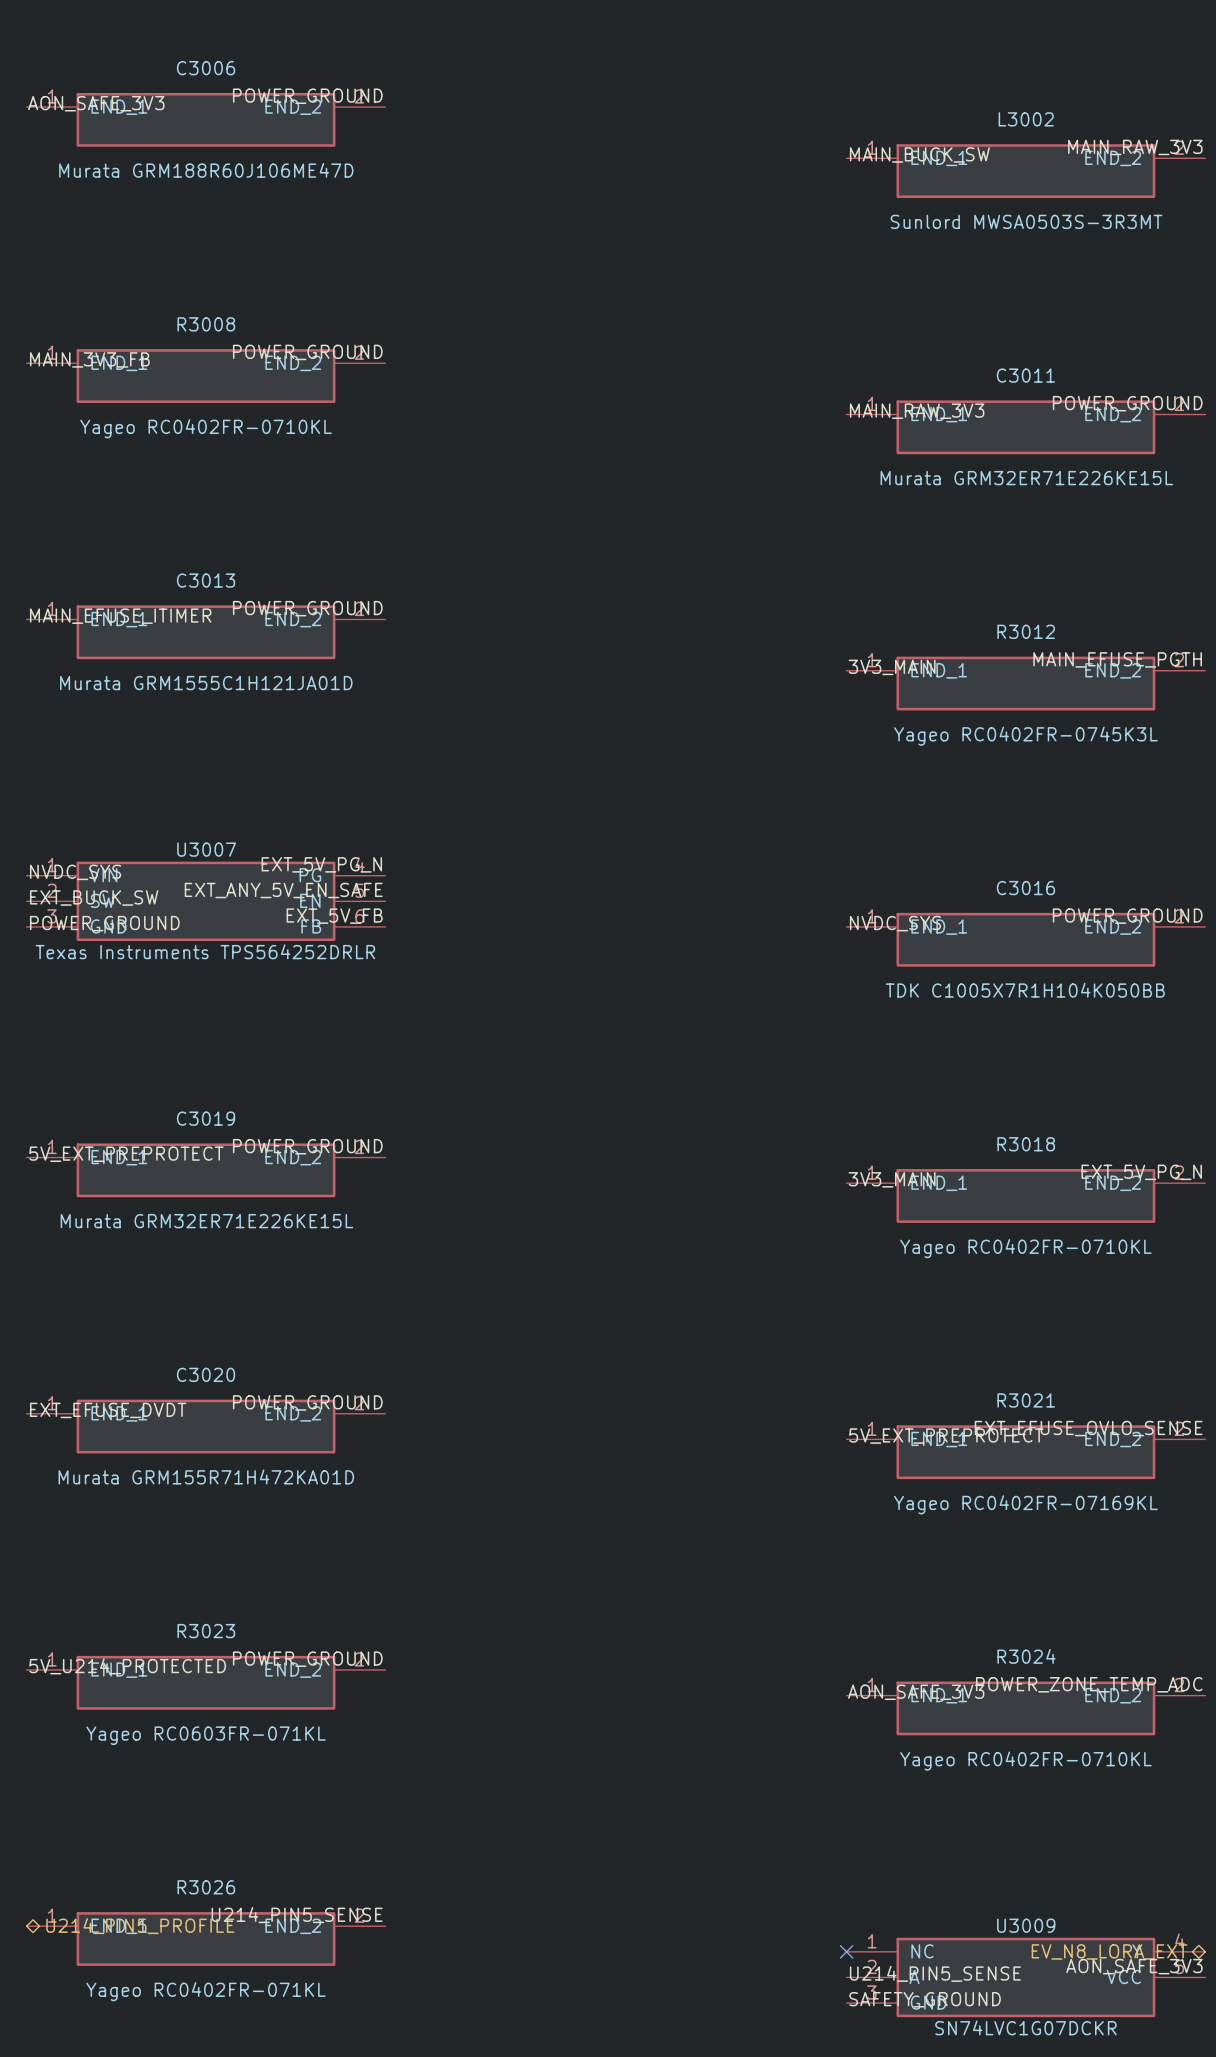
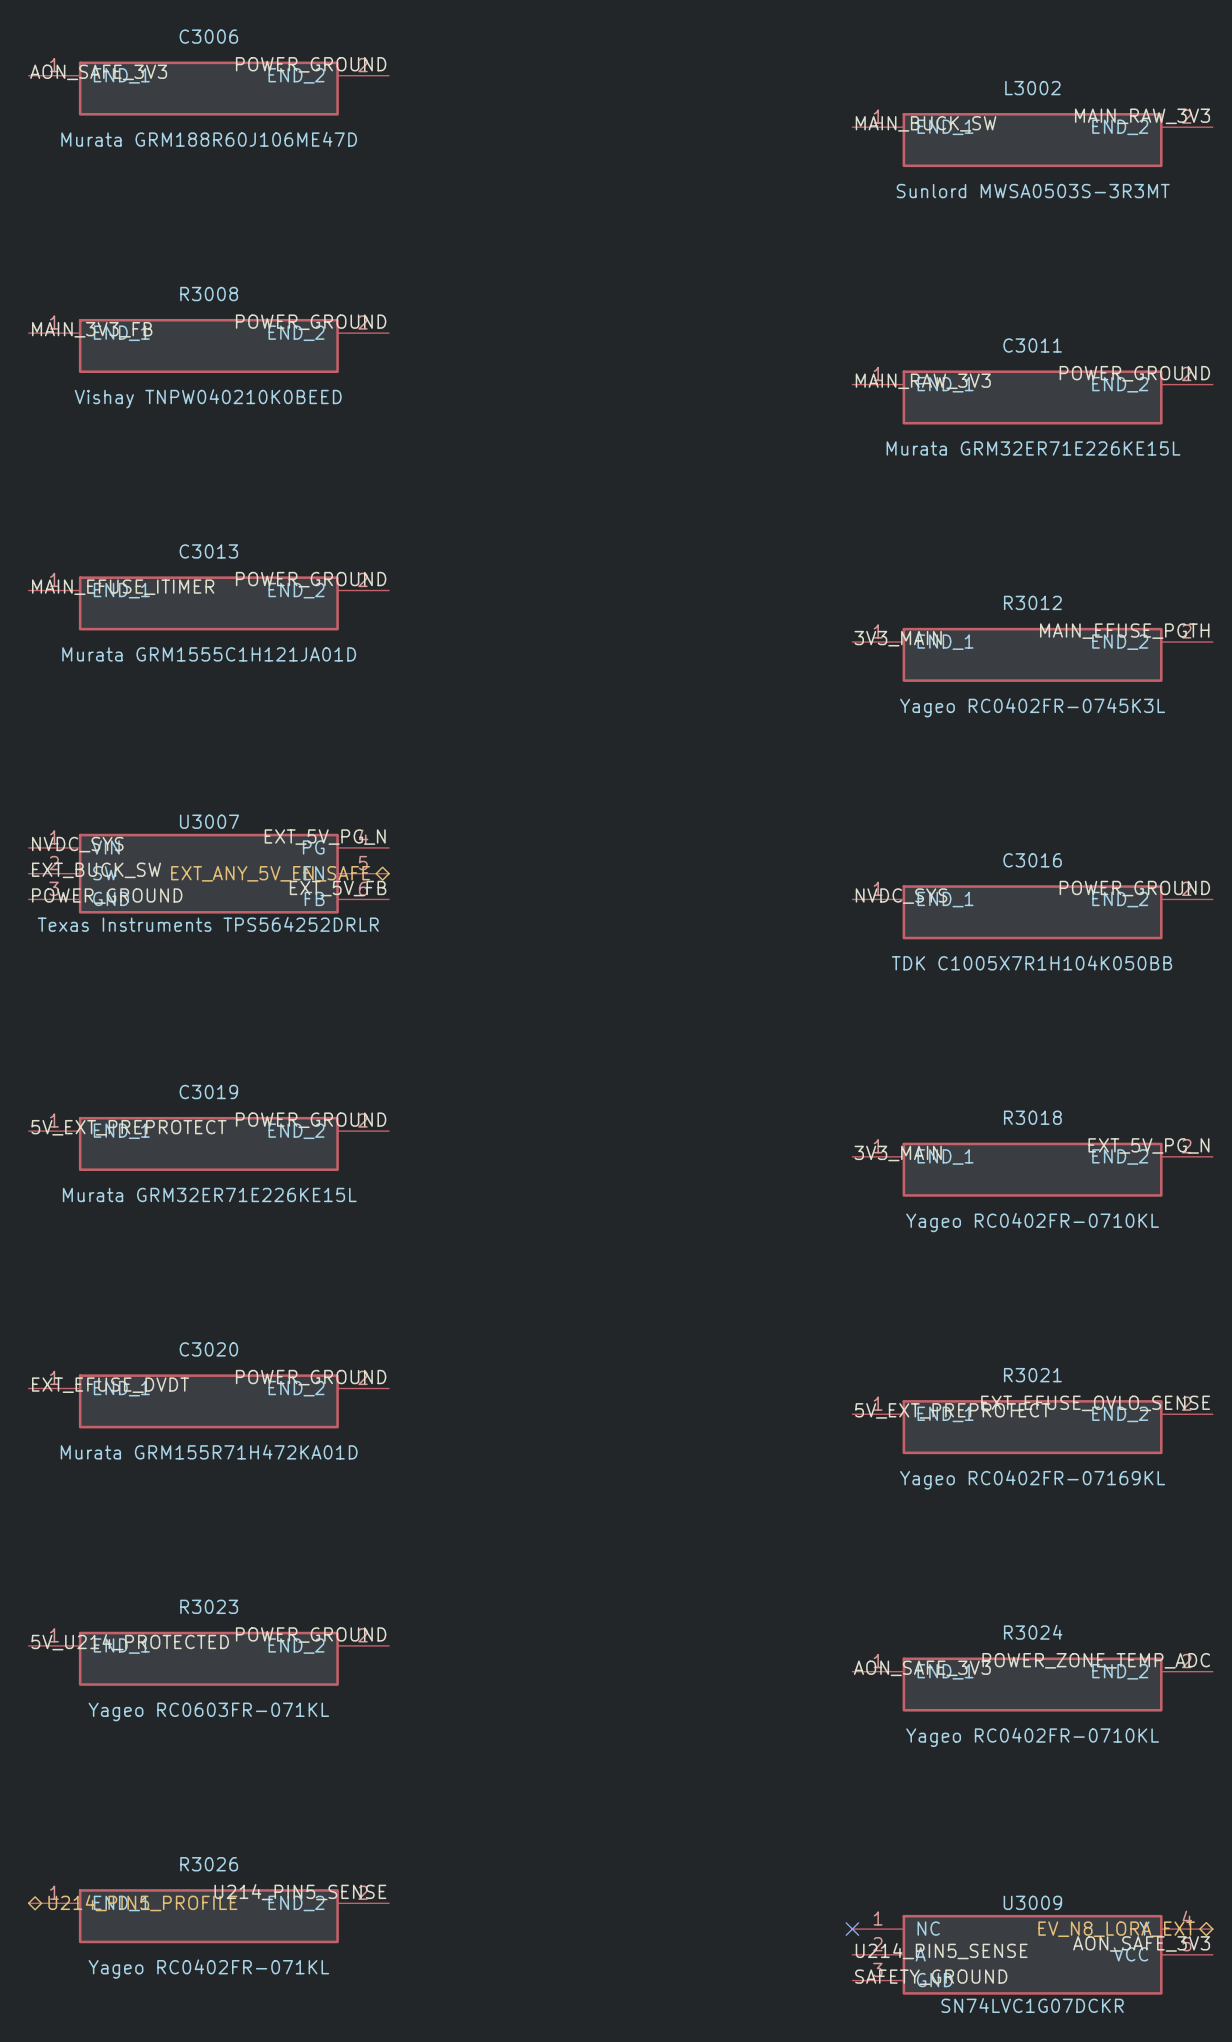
R3008 value: Yageo RC0402FR-0710KL (206, 428) -> Vishay TNPW040210K0BEED (208, 398)
label: EXT_ANY_5V_EN_SAFE (283, 890) -> none
hierarchical label: none -> EXT_ANY_5V_EN_SAFE (270, 873)

